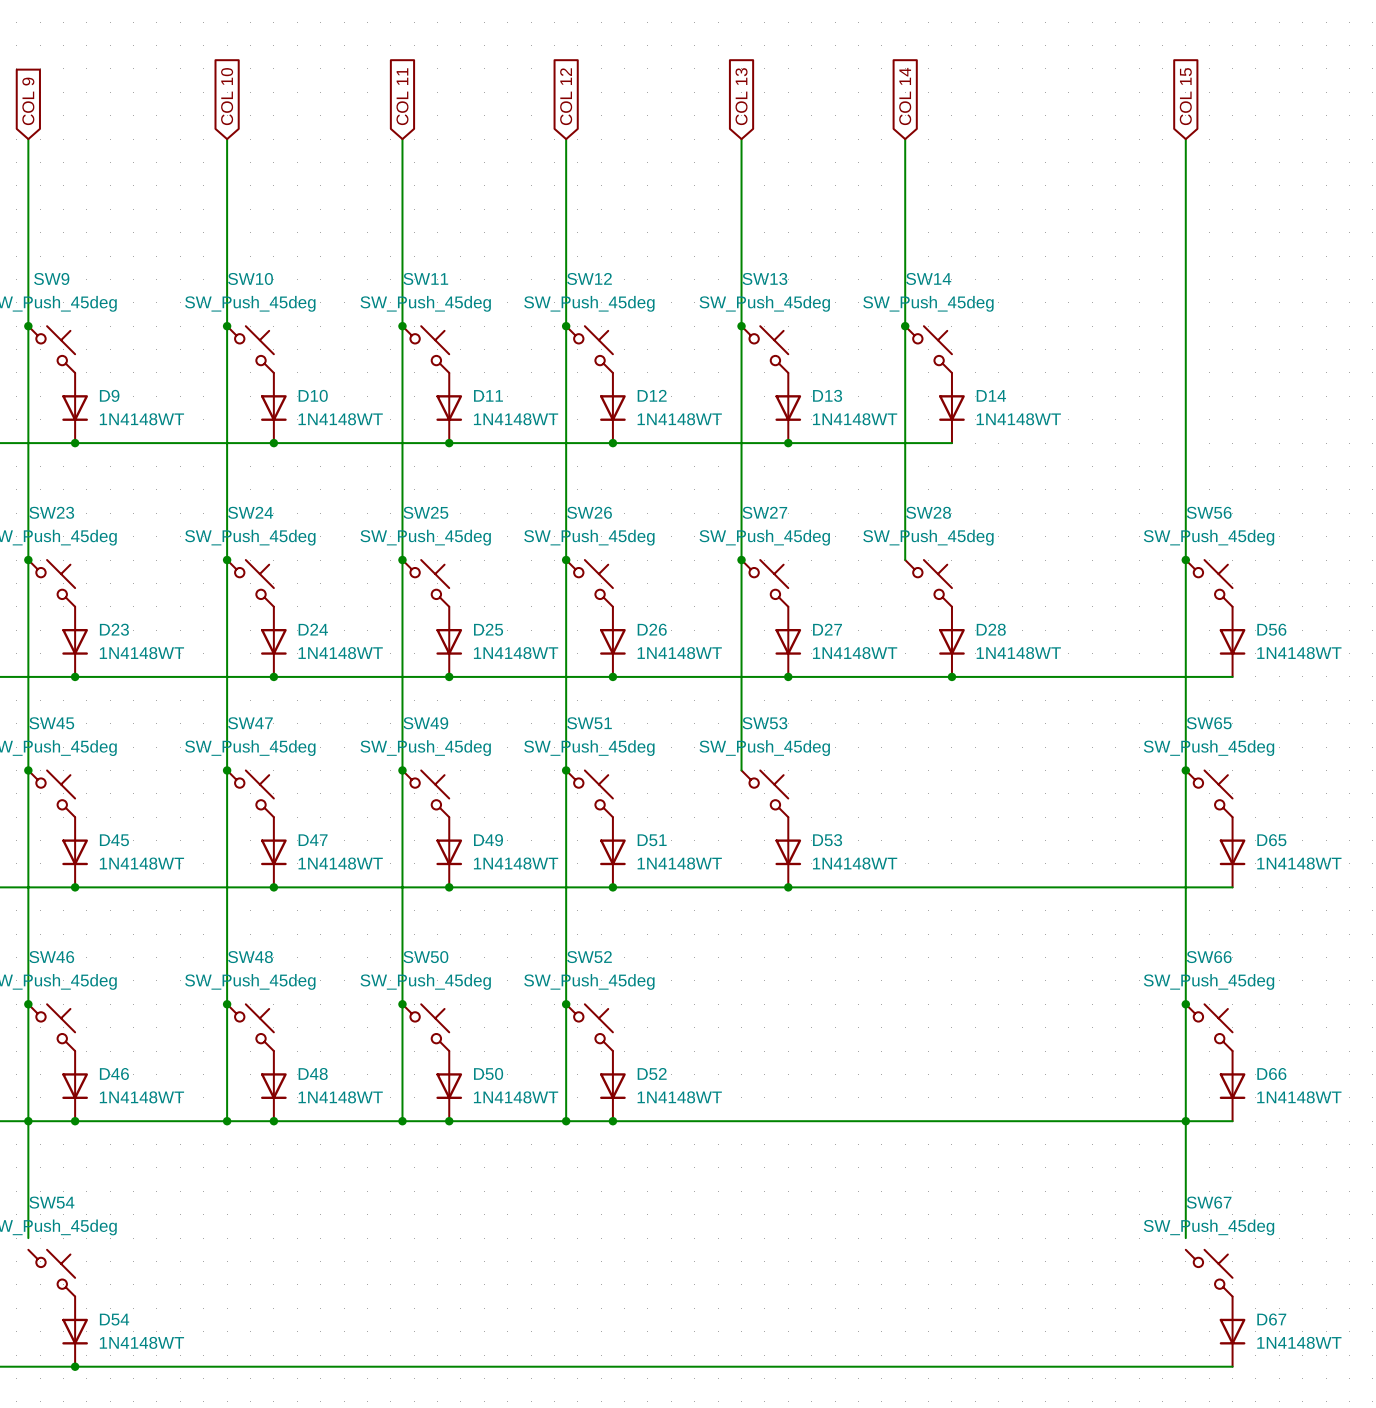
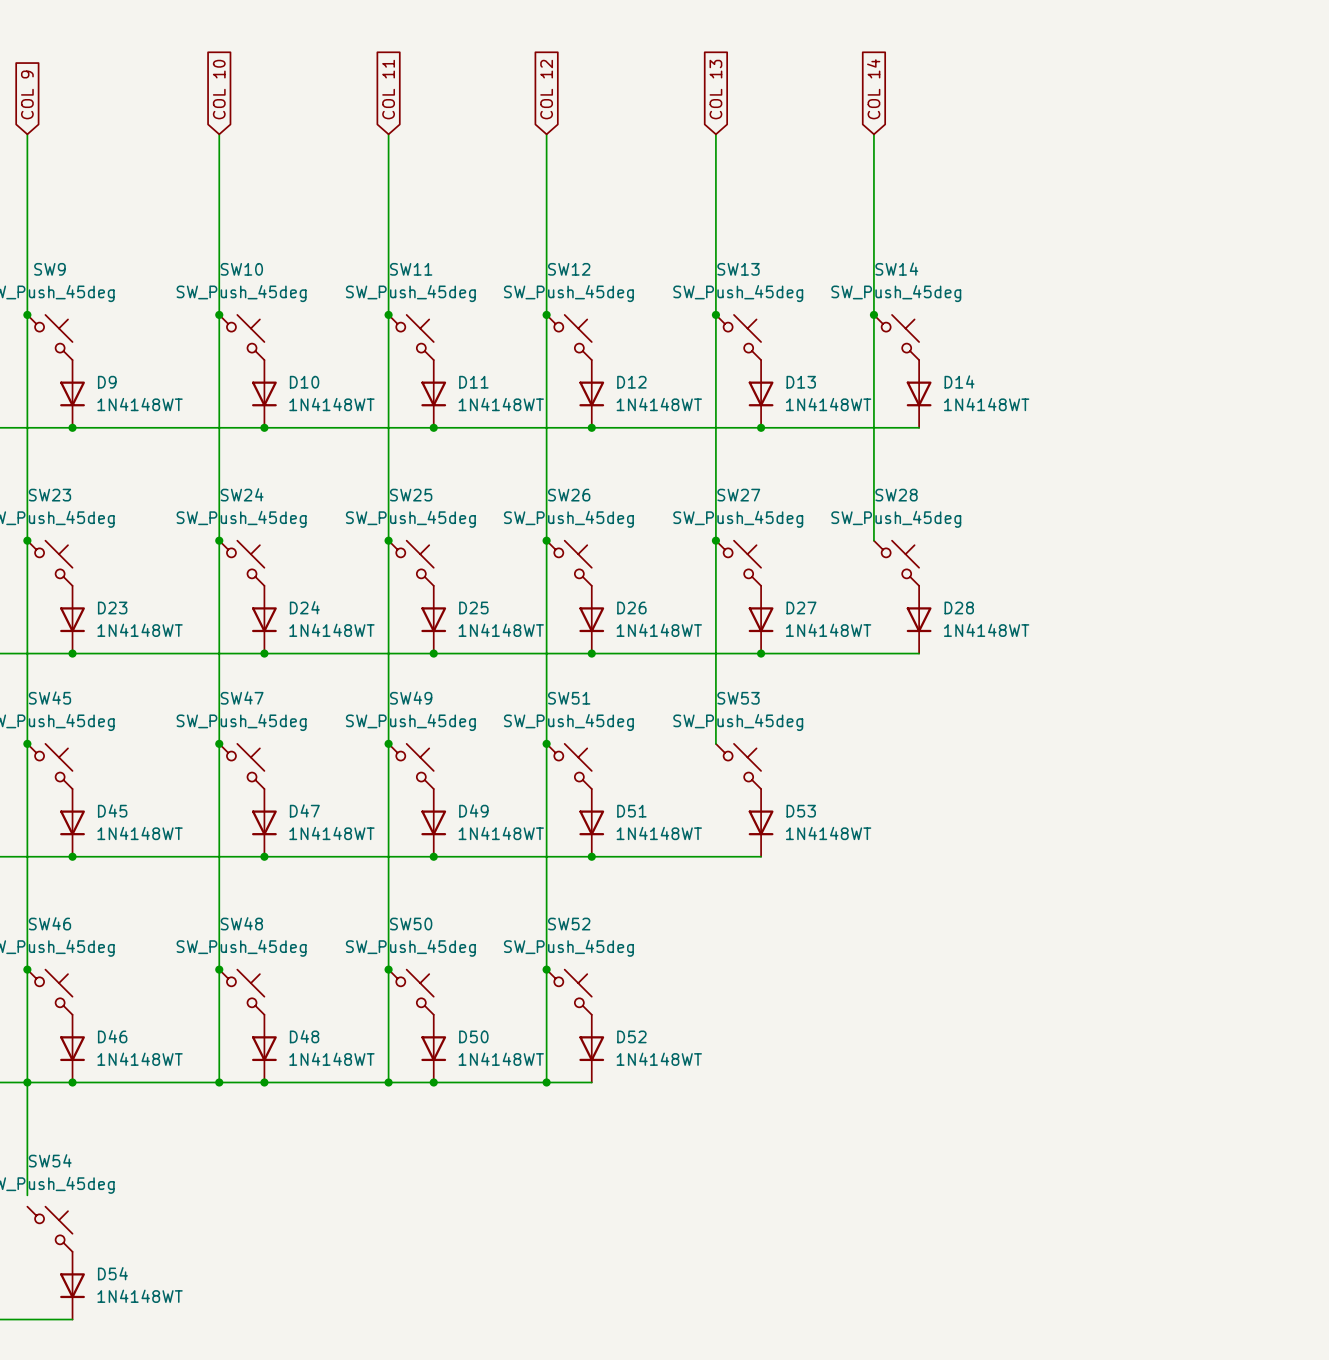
global label: COL 15 (1185, 96) -> none
wire: (1185, 139) (1185, 1238) -> none
junction: (1185, 560) -> none
SW56: SW_Push_45deg (1209, 583) -> none
D56: 1N4148WT (1232, 641) -> none
wire: (951, 676) (1232, 676) -> none
junction: (951, 676) -> none
junction: (1185, 770) -> none
SW65: SW_Push_45deg (1209, 793) -> none
D65: 1N4148WT (1232, 852) -> none
wire: (788, 887) (1232, 887) -> none
junction: (788, 887) -> none
junction: (1185, 1004) -> none
SW66: SW_Push_45deg (1209, 1027) -> none
D66: 1N4148WT (1232, 1086) -> none
wire: (612, 1121) (1232, 1121) -> none
junction: (612, 1121) -> none
junction: (1185, 1121) -> none
SW67: SW_Push_45deg (1209, 1273) -> none
D67: 1N4148WT (1232, 1331) -> none
wire: (75, 1366) (1232, 1366) -> none
junction: (75, 1366) -> none

